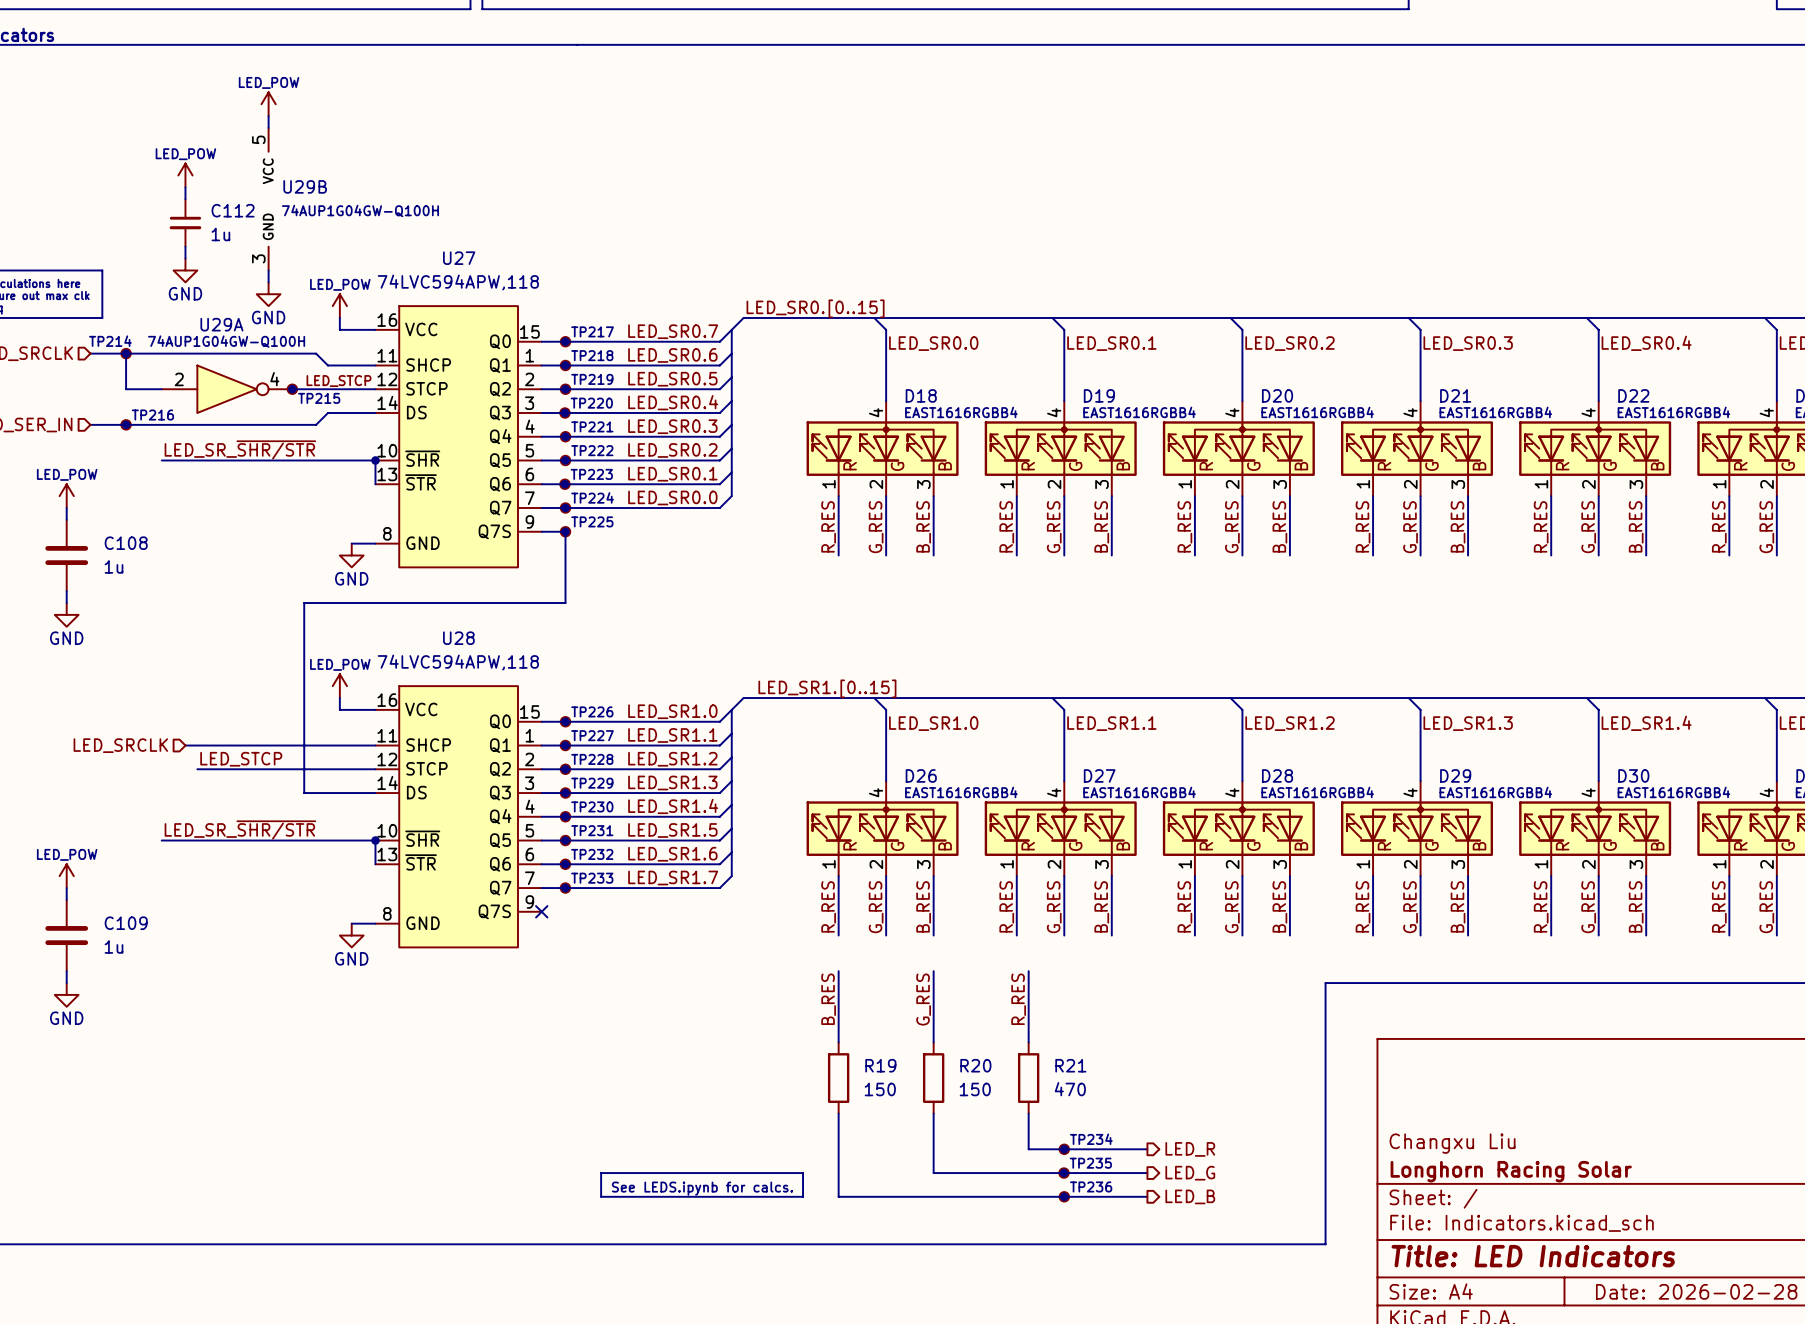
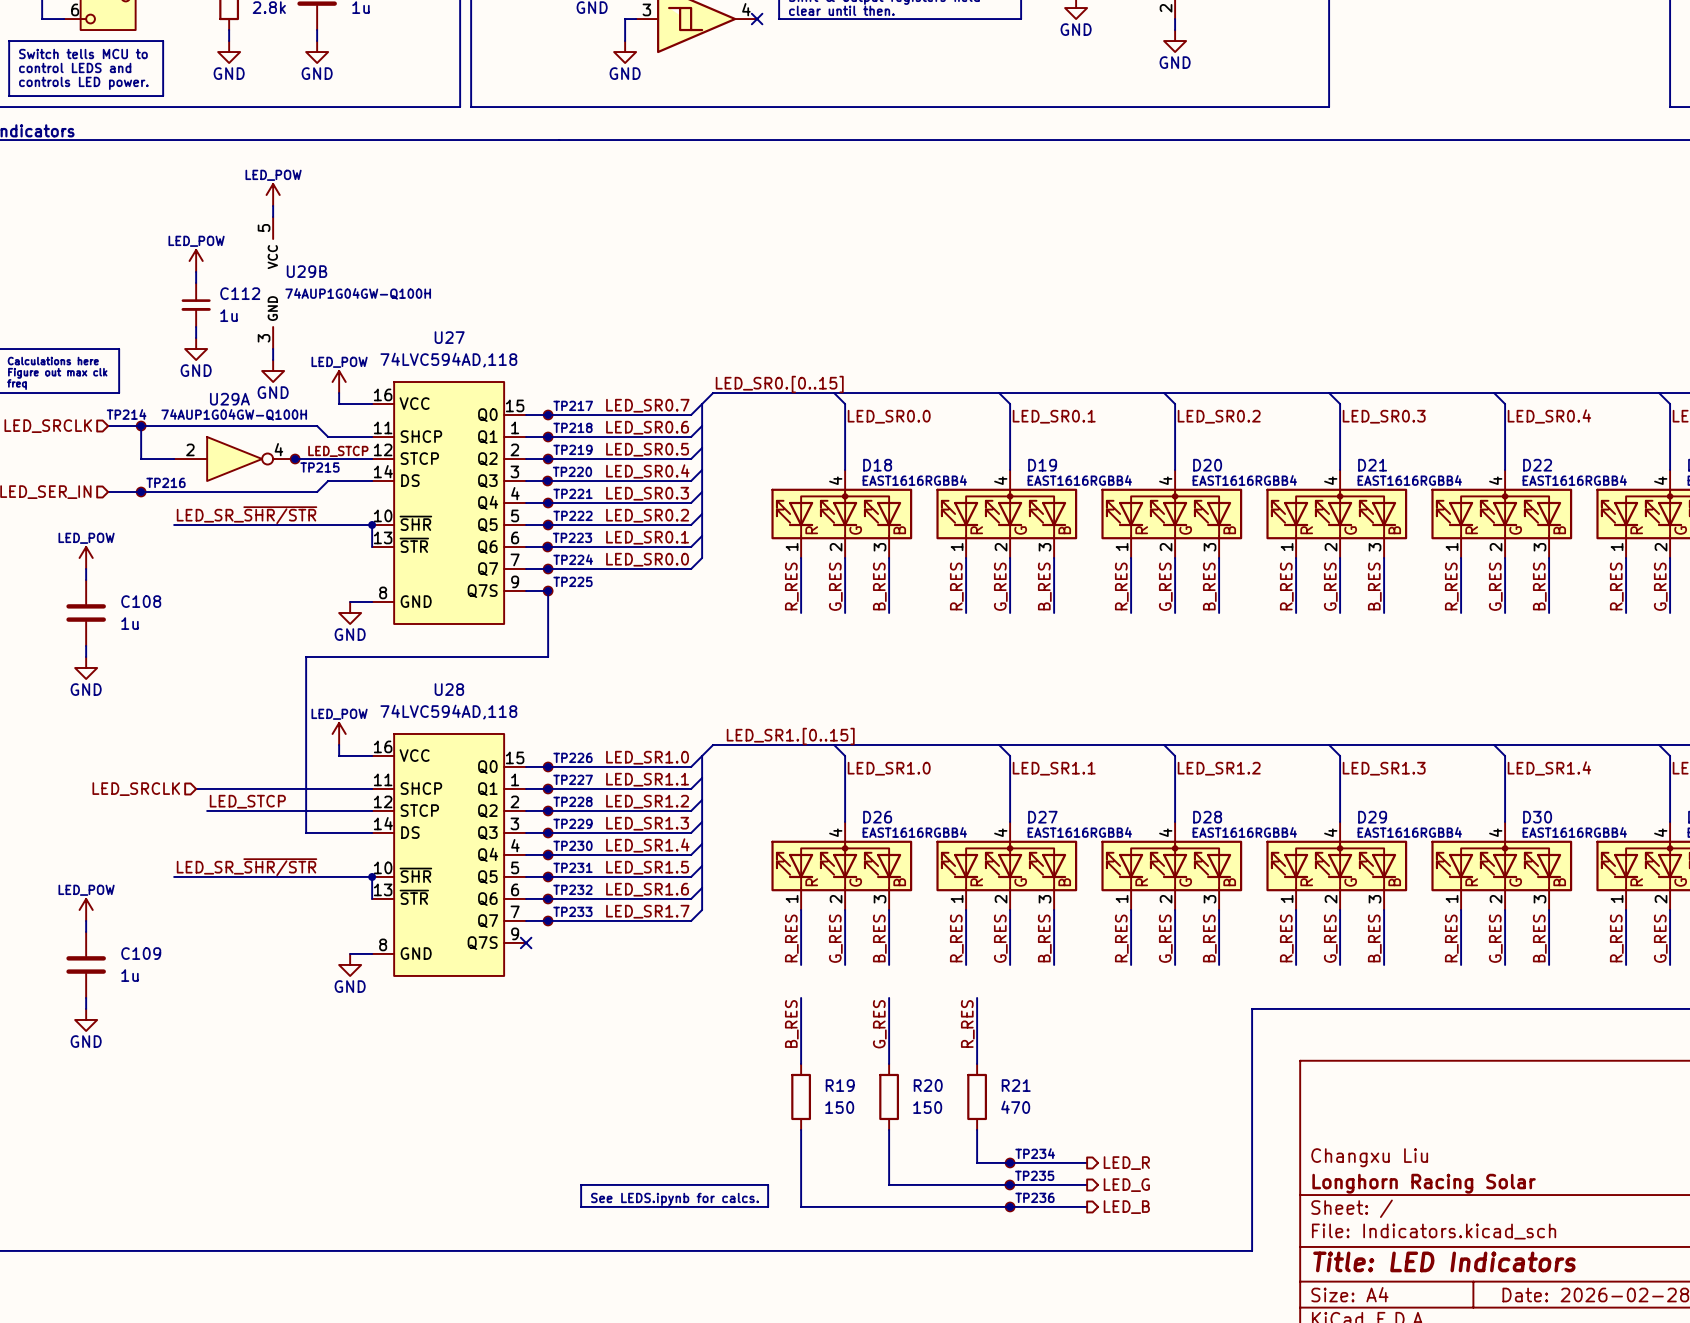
U27 value: 74LVC594APW,118 (458, 282) -> 74LVC594AD,118 (448, 360)
U28 value: 74LVC594APW,118 (458, 662) -> 74LVC594AD,118 (448, 712)

